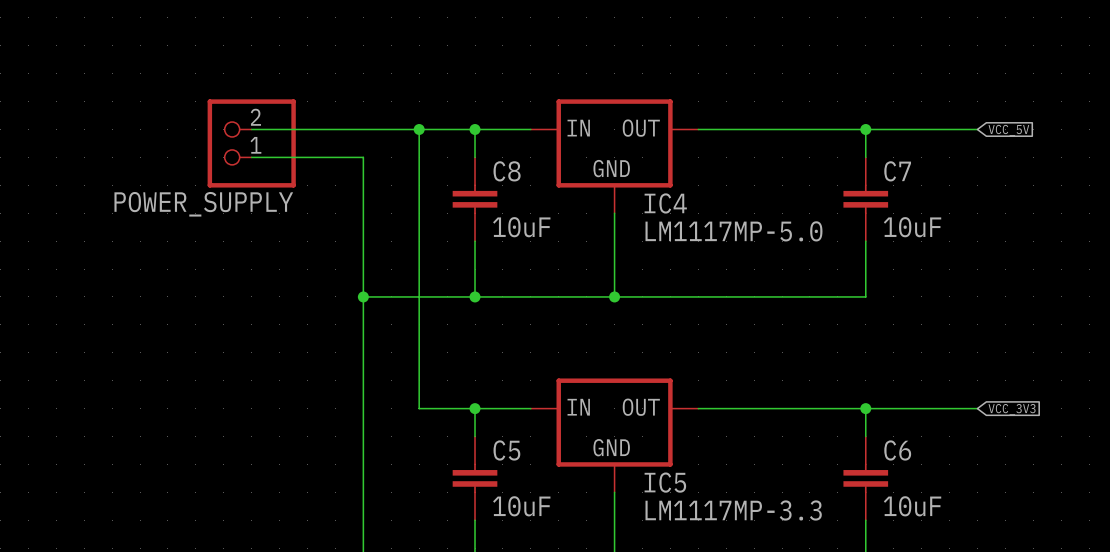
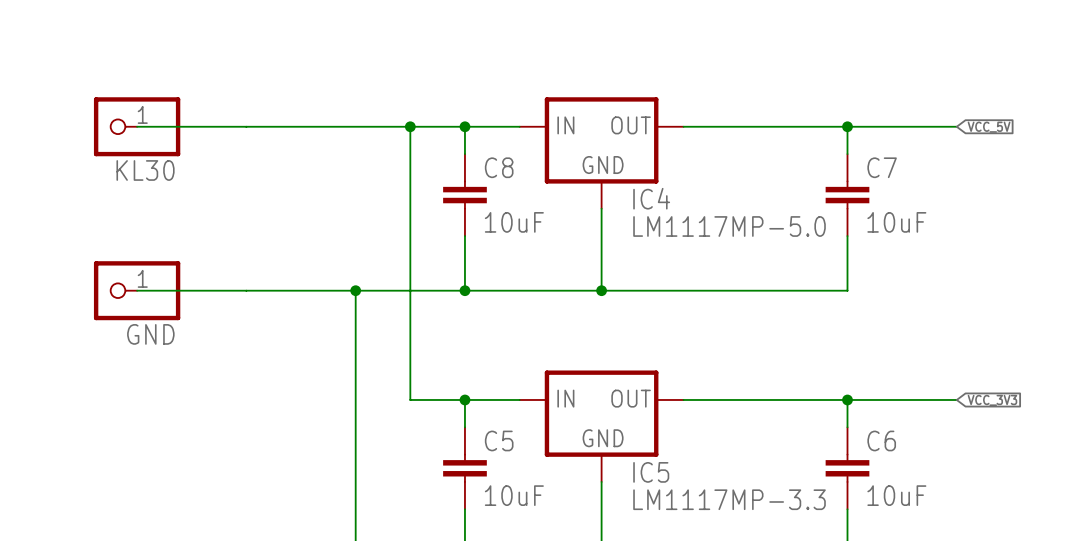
wire: none -> (137, 126) (246, 126)
KL30: none -> (137, 126)
POWER_SUPPLY: (251, 143) -> none
wire: (251, 157) (363, 157) (363, 296) -> (137, 290) (355, 290)
GND: none -> (137, 290)

